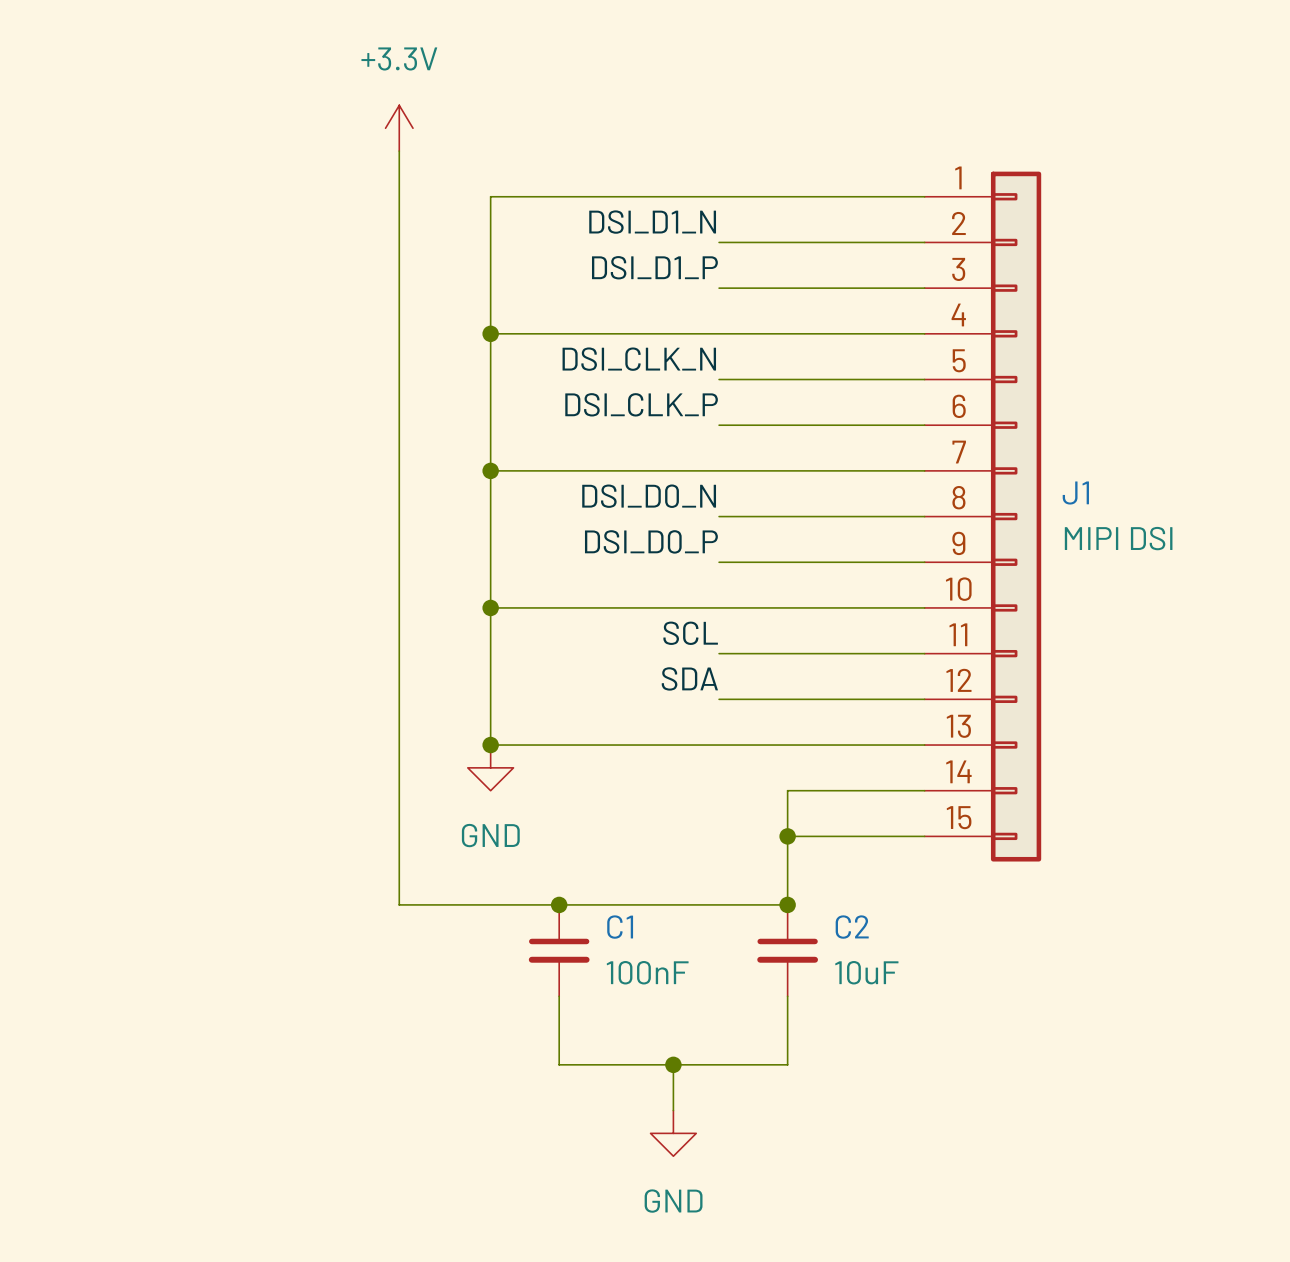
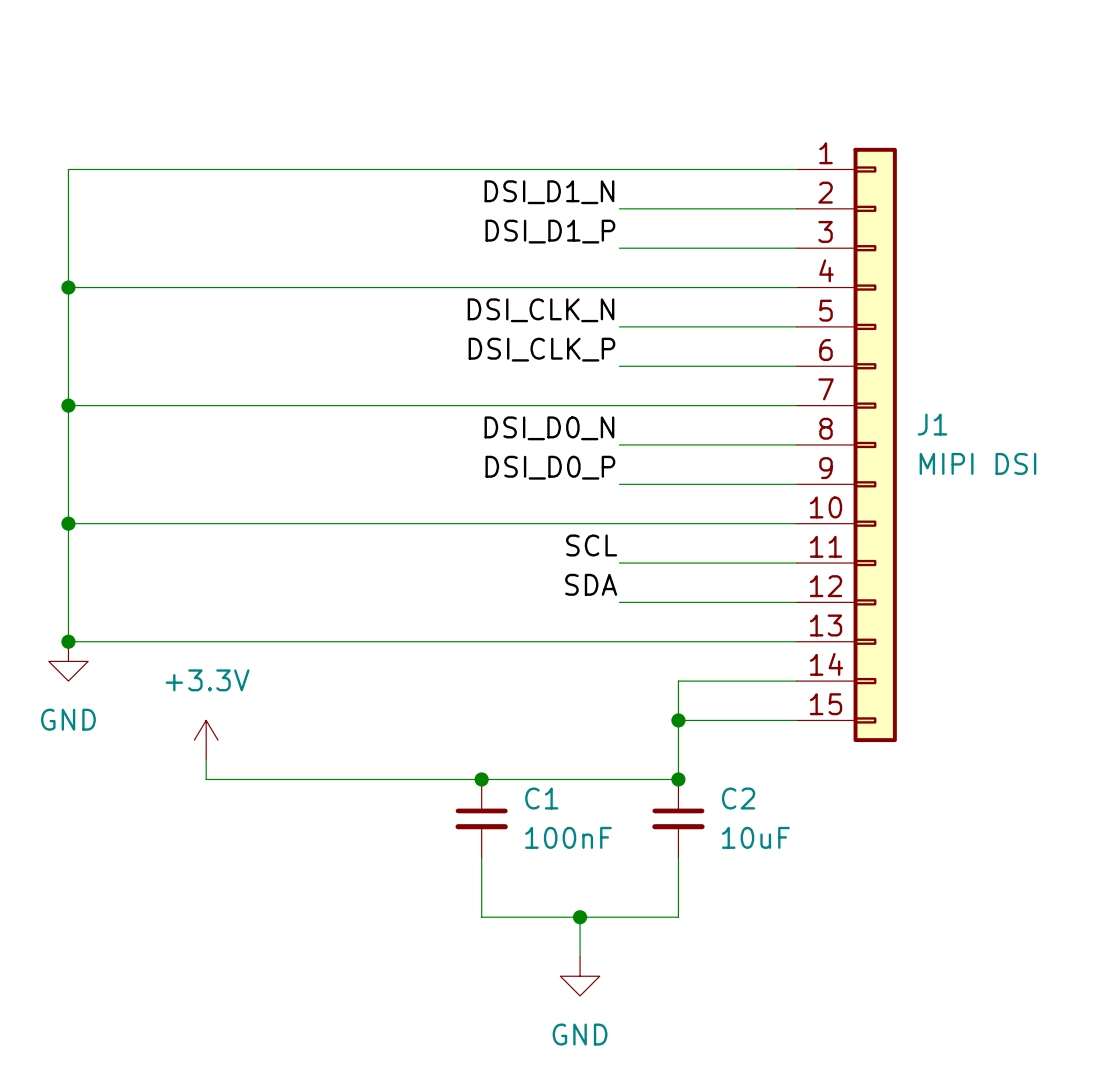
power symbol: +3.3V (399, 128) -> none
wire: (399, 151) (399, 904) -> (206, 759) (206, 779) (343, 779)
wire: (490, 196) (490, 745) -> (422, 169) (68, 169) (68, 641) (422, 641)
wire: none -> (68, 287) (422, 287)
junction: none -> (68, 287)
junction: (490, 333) -> none
wire: none -> (68, 405) (422, 405)
junction: none -> (68, 405)
junction: (490, 470) -> none
wire: none -> (68, 523) (422, 523)
junction: none -> (68, 523)
junction: (490, 607) -> none
junction: none -> (68, 641)
junction: (490, 745) -> none
power symbol position: GND (490, 767) -> GND (68, 661)
power symbol: none -> +3.3V (206, 740)

